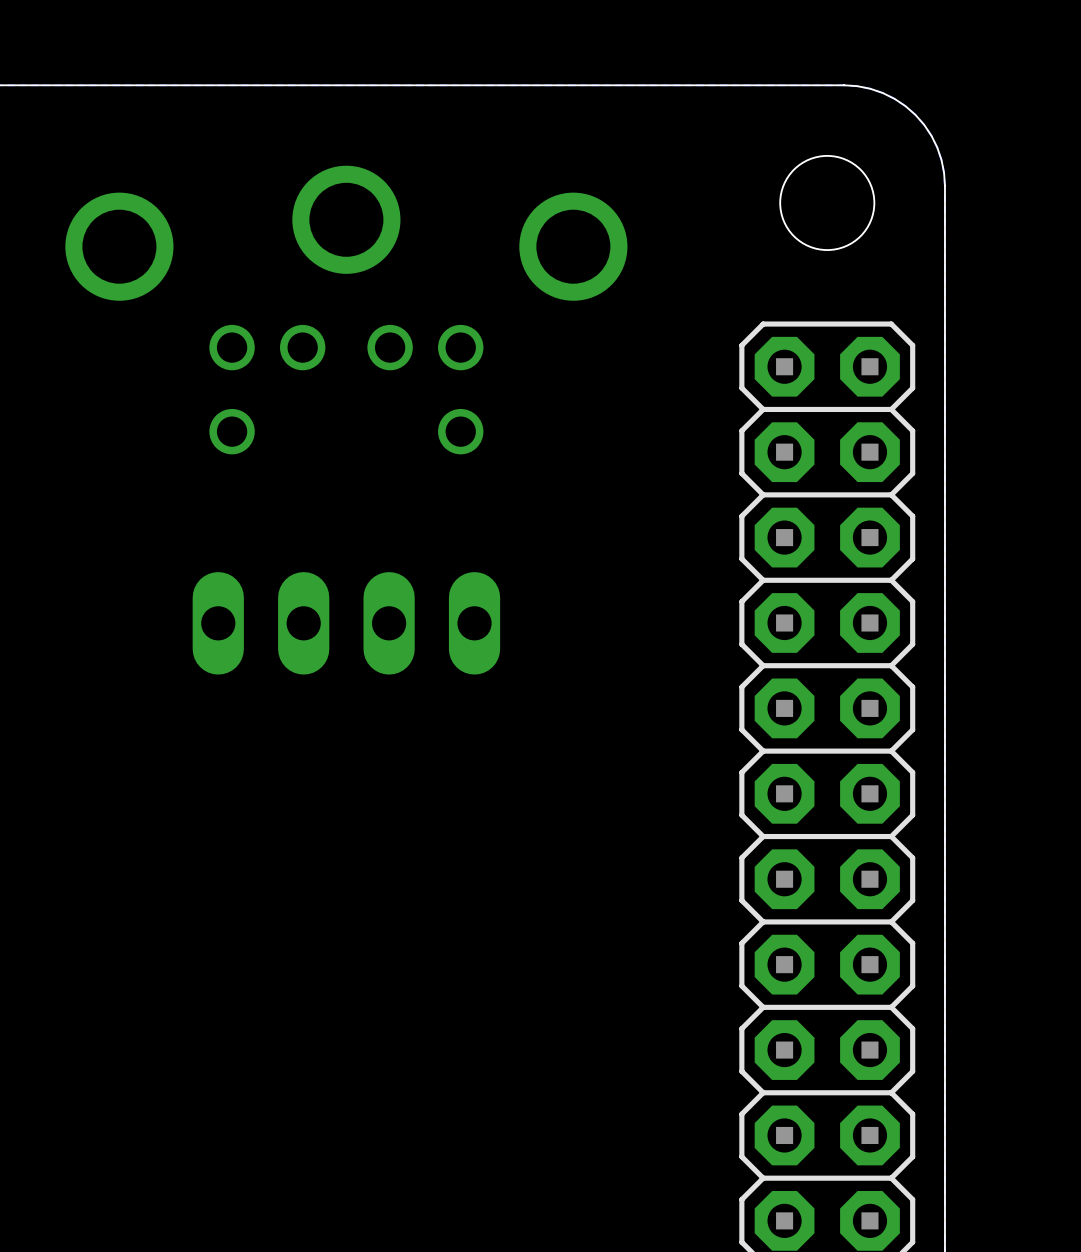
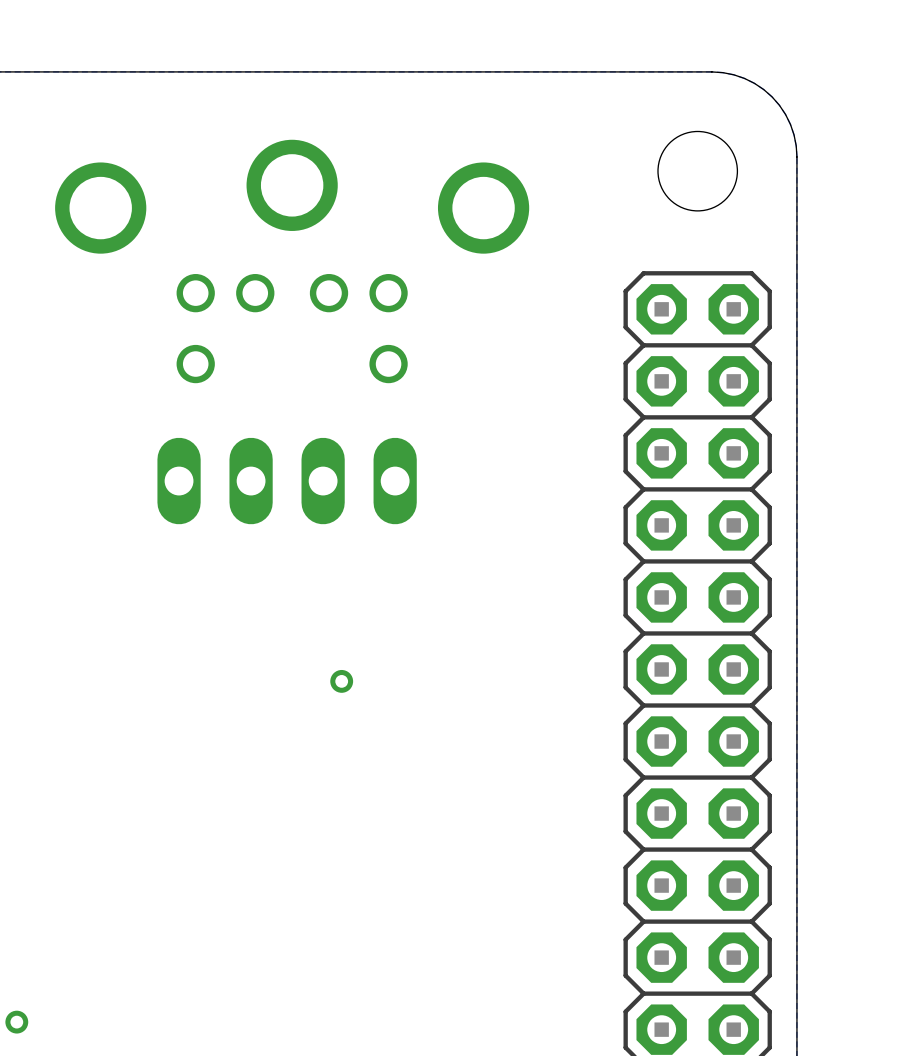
part position: (346, 623) -> (287, 481)
via: none -> (341, 681)
via: none -> (16, 1022)

